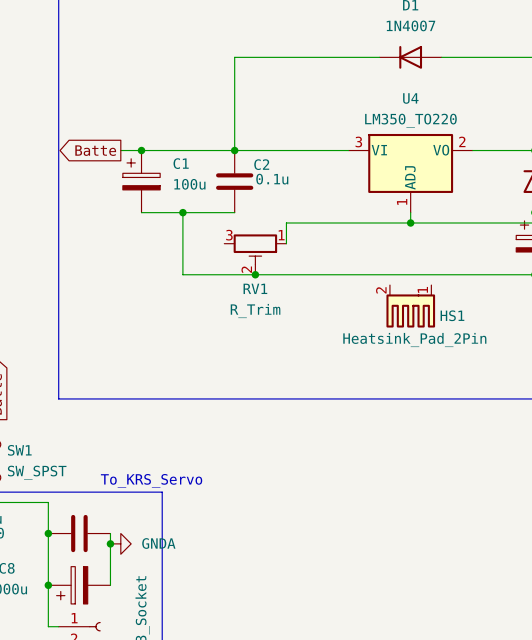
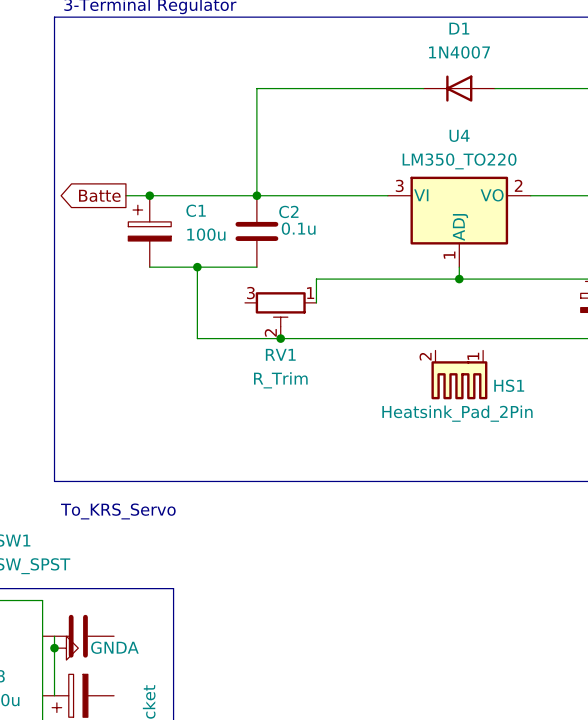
text position: To_KRS_Servo (151, 480) -> To_KRS_Servo (118, 511)
junction position: (48, 533) -> (54, 648)
wire: (110, 533) (110, 585) -> (54, 636) (54, 695)
junction: (110, 543) -> none
power symbol position: GNDA (120, 543) -> GNDA (66, 648)
junction: (48, 585) -> none

